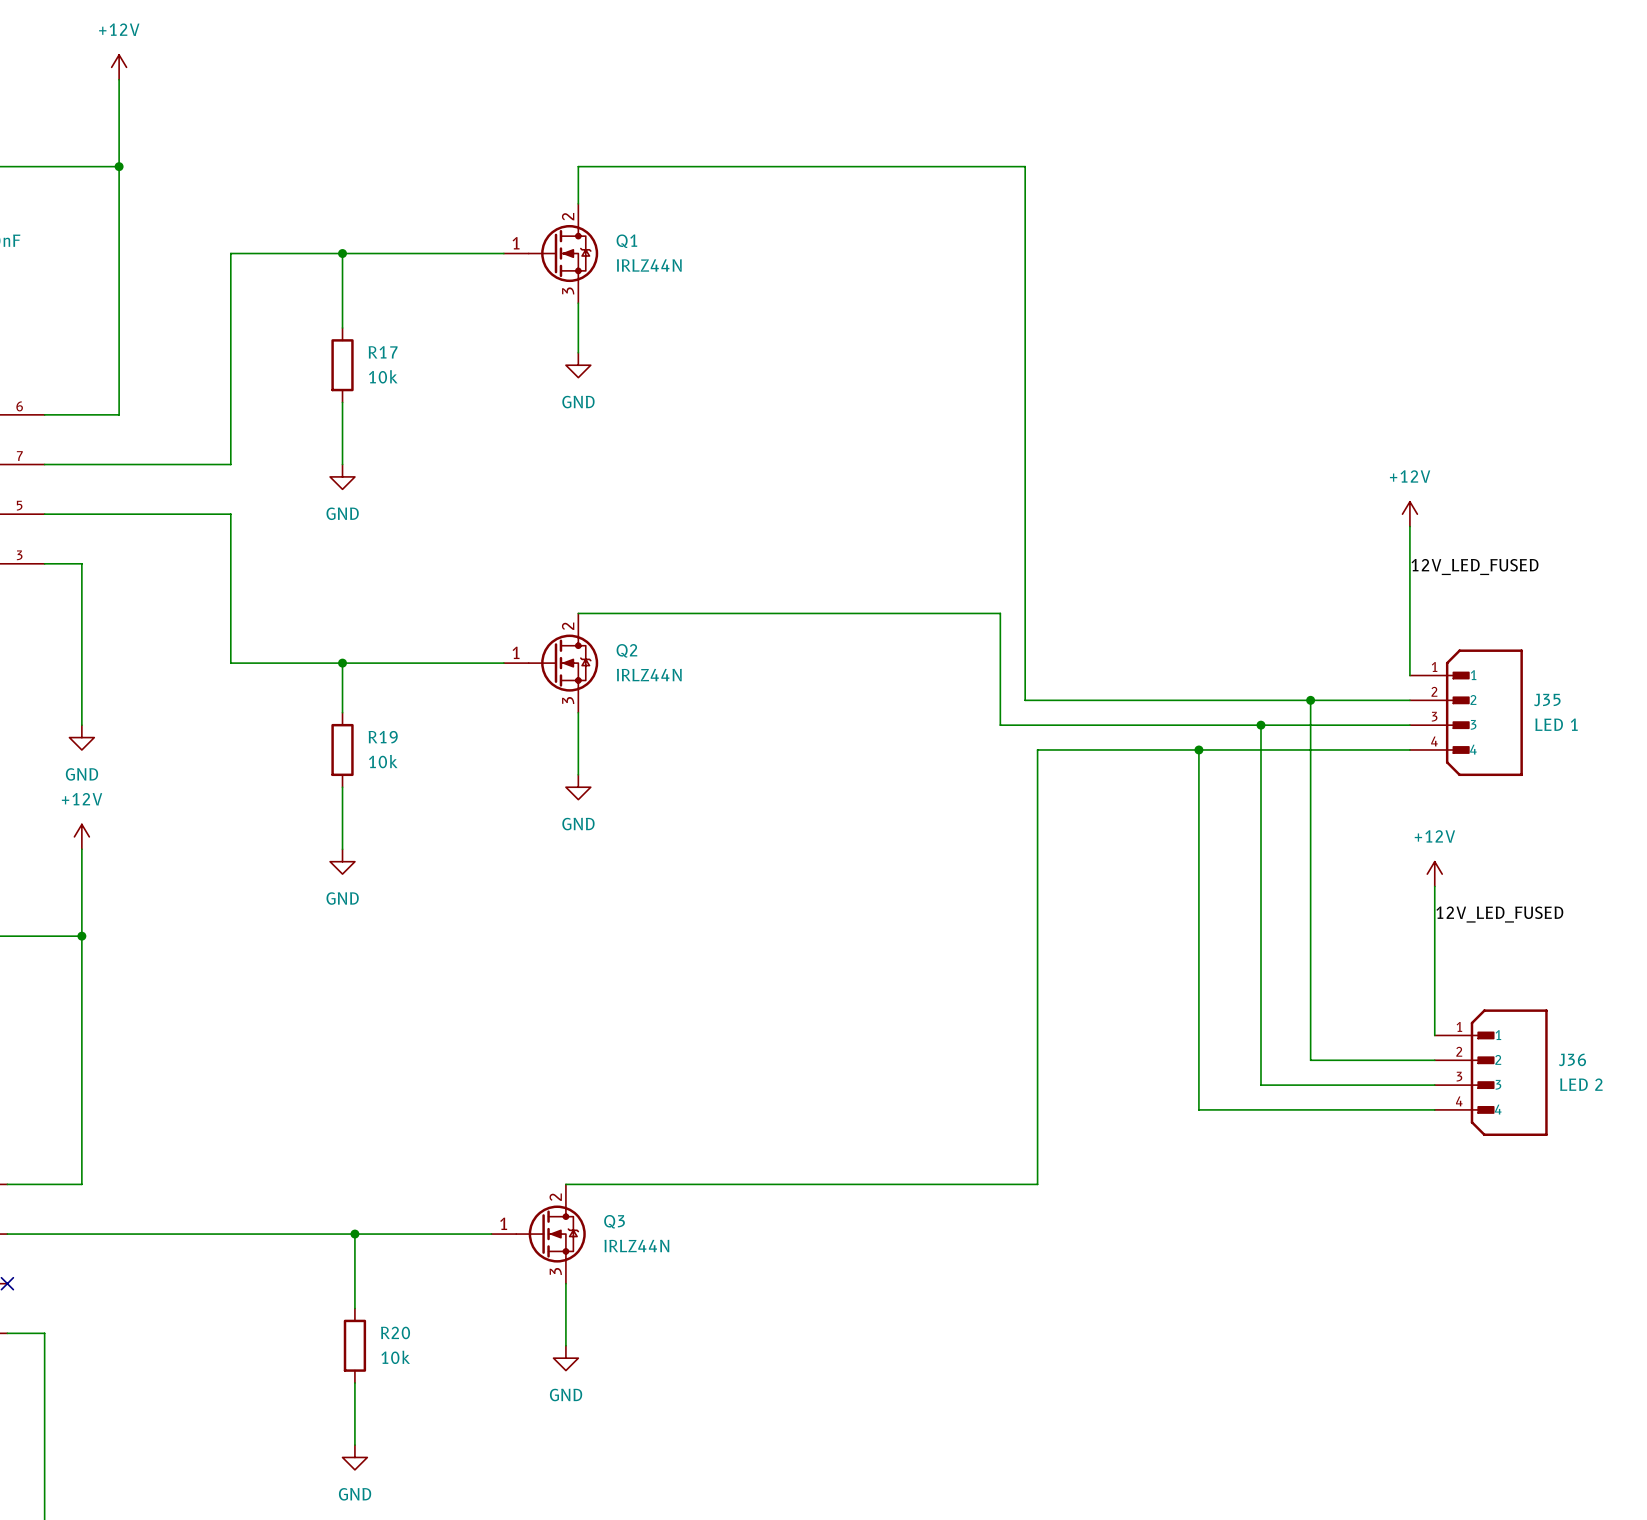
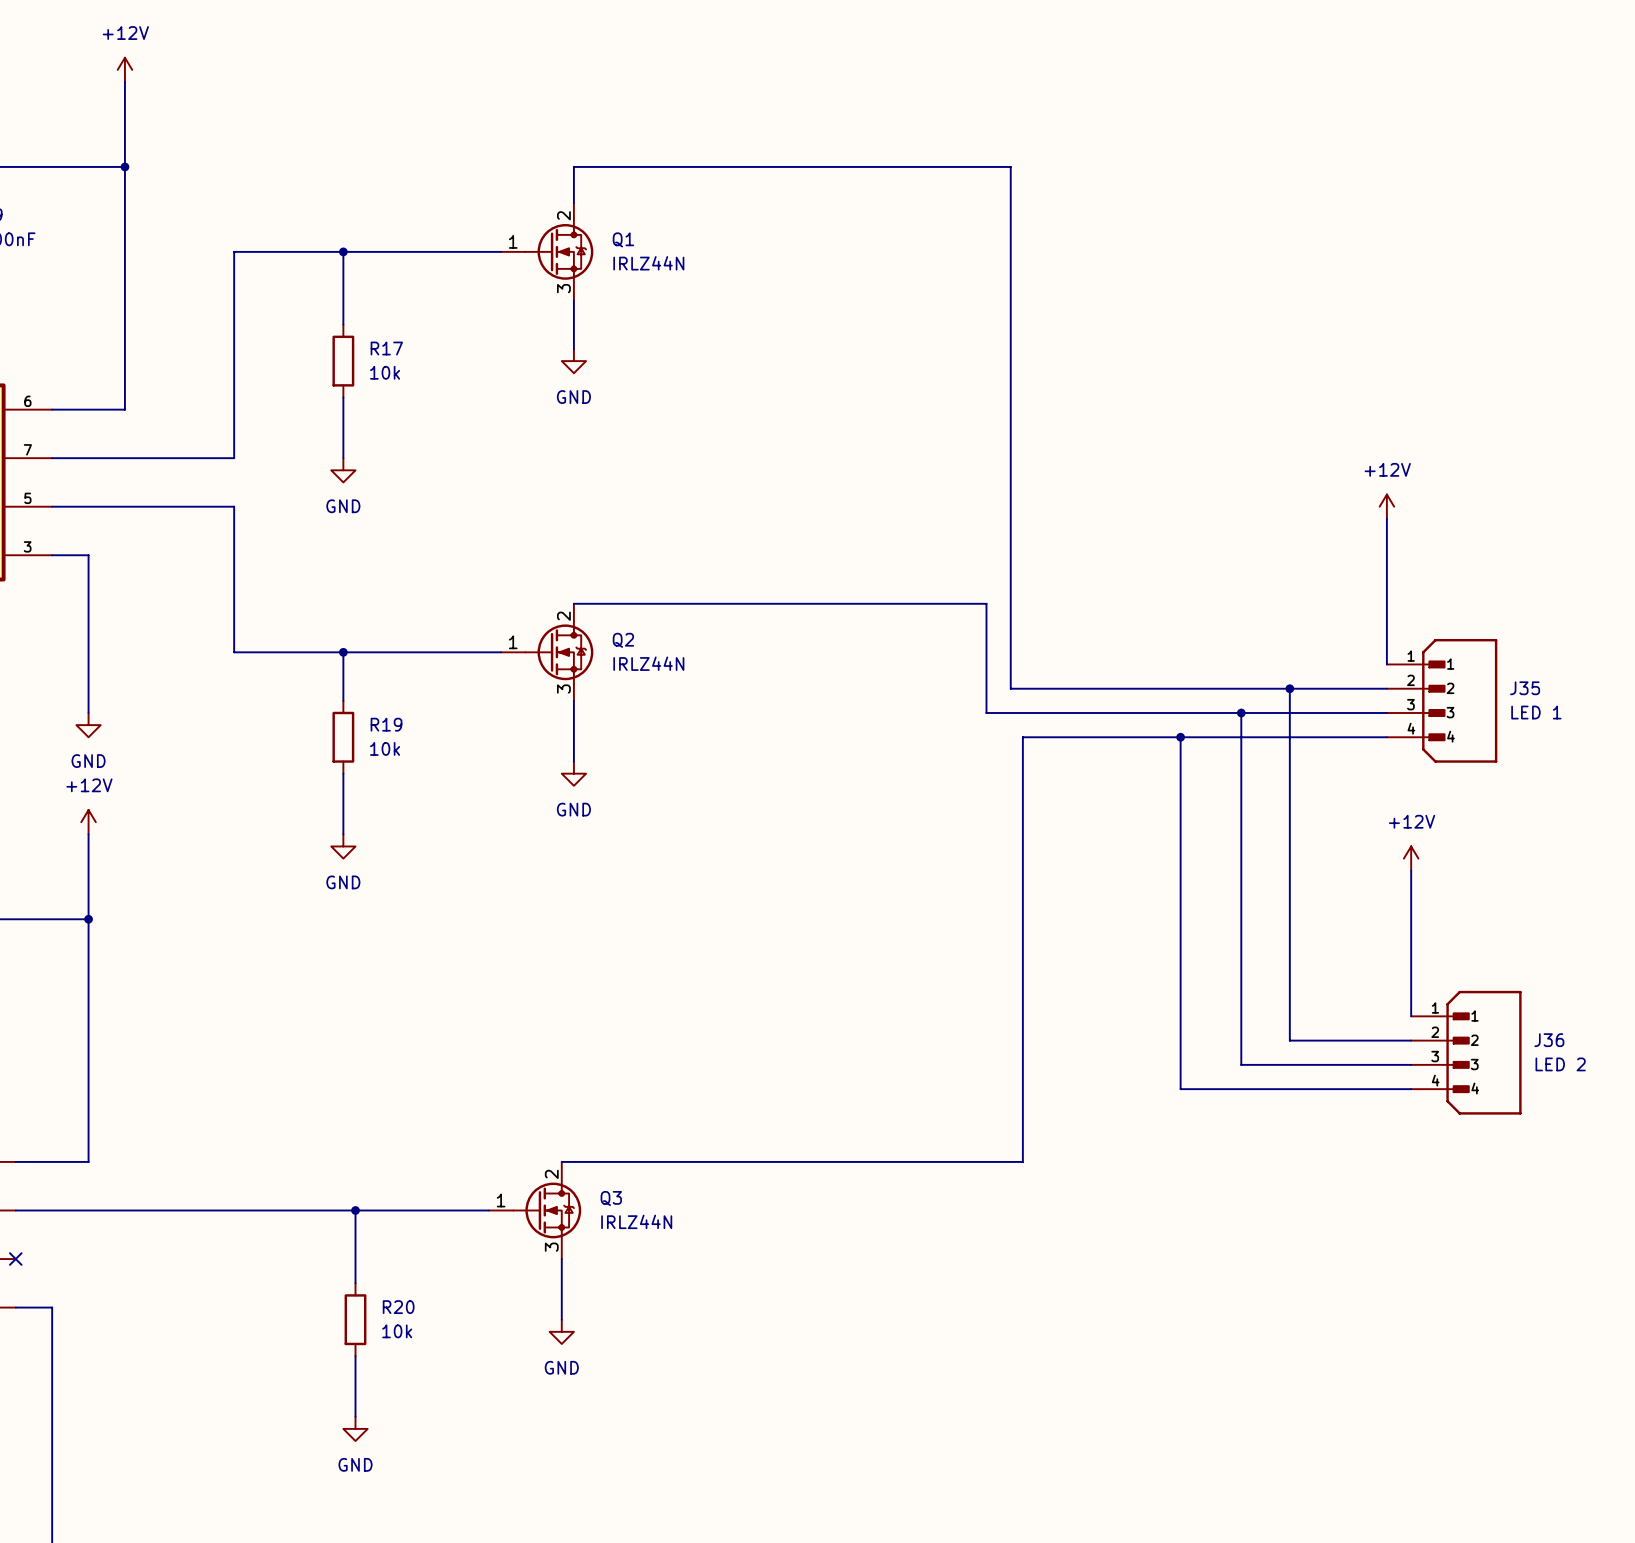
label: 12V_LED_FUSED (1475, 567) -> none
label: 12V_LED_FUSED (1499, 914) -> none

